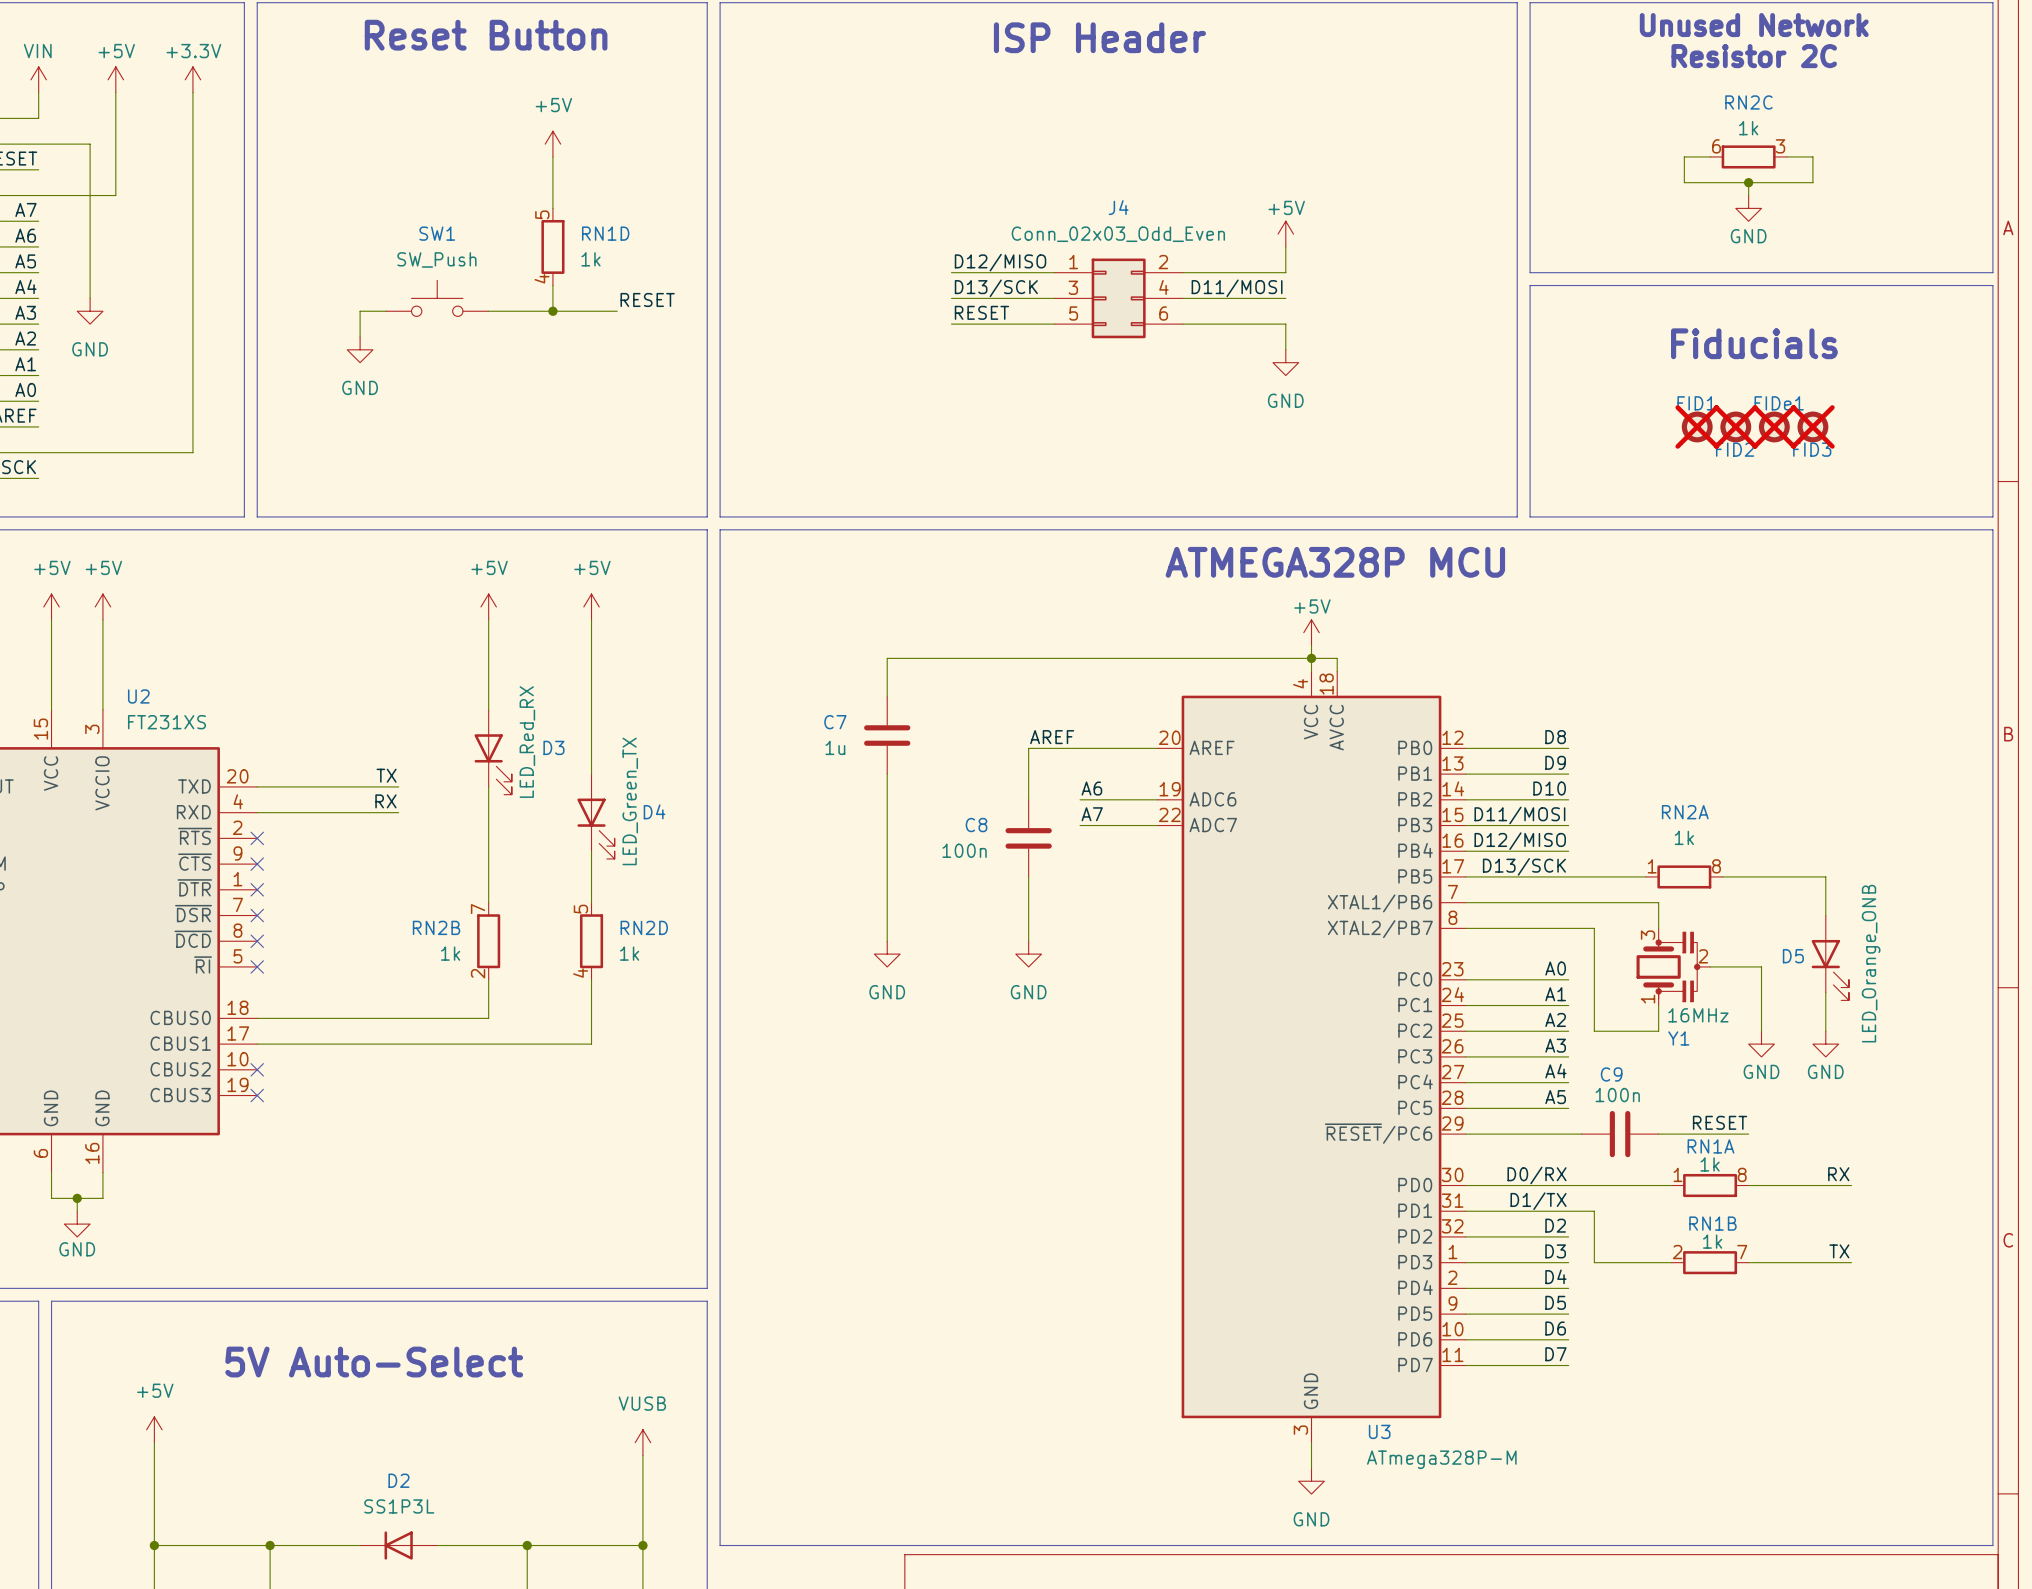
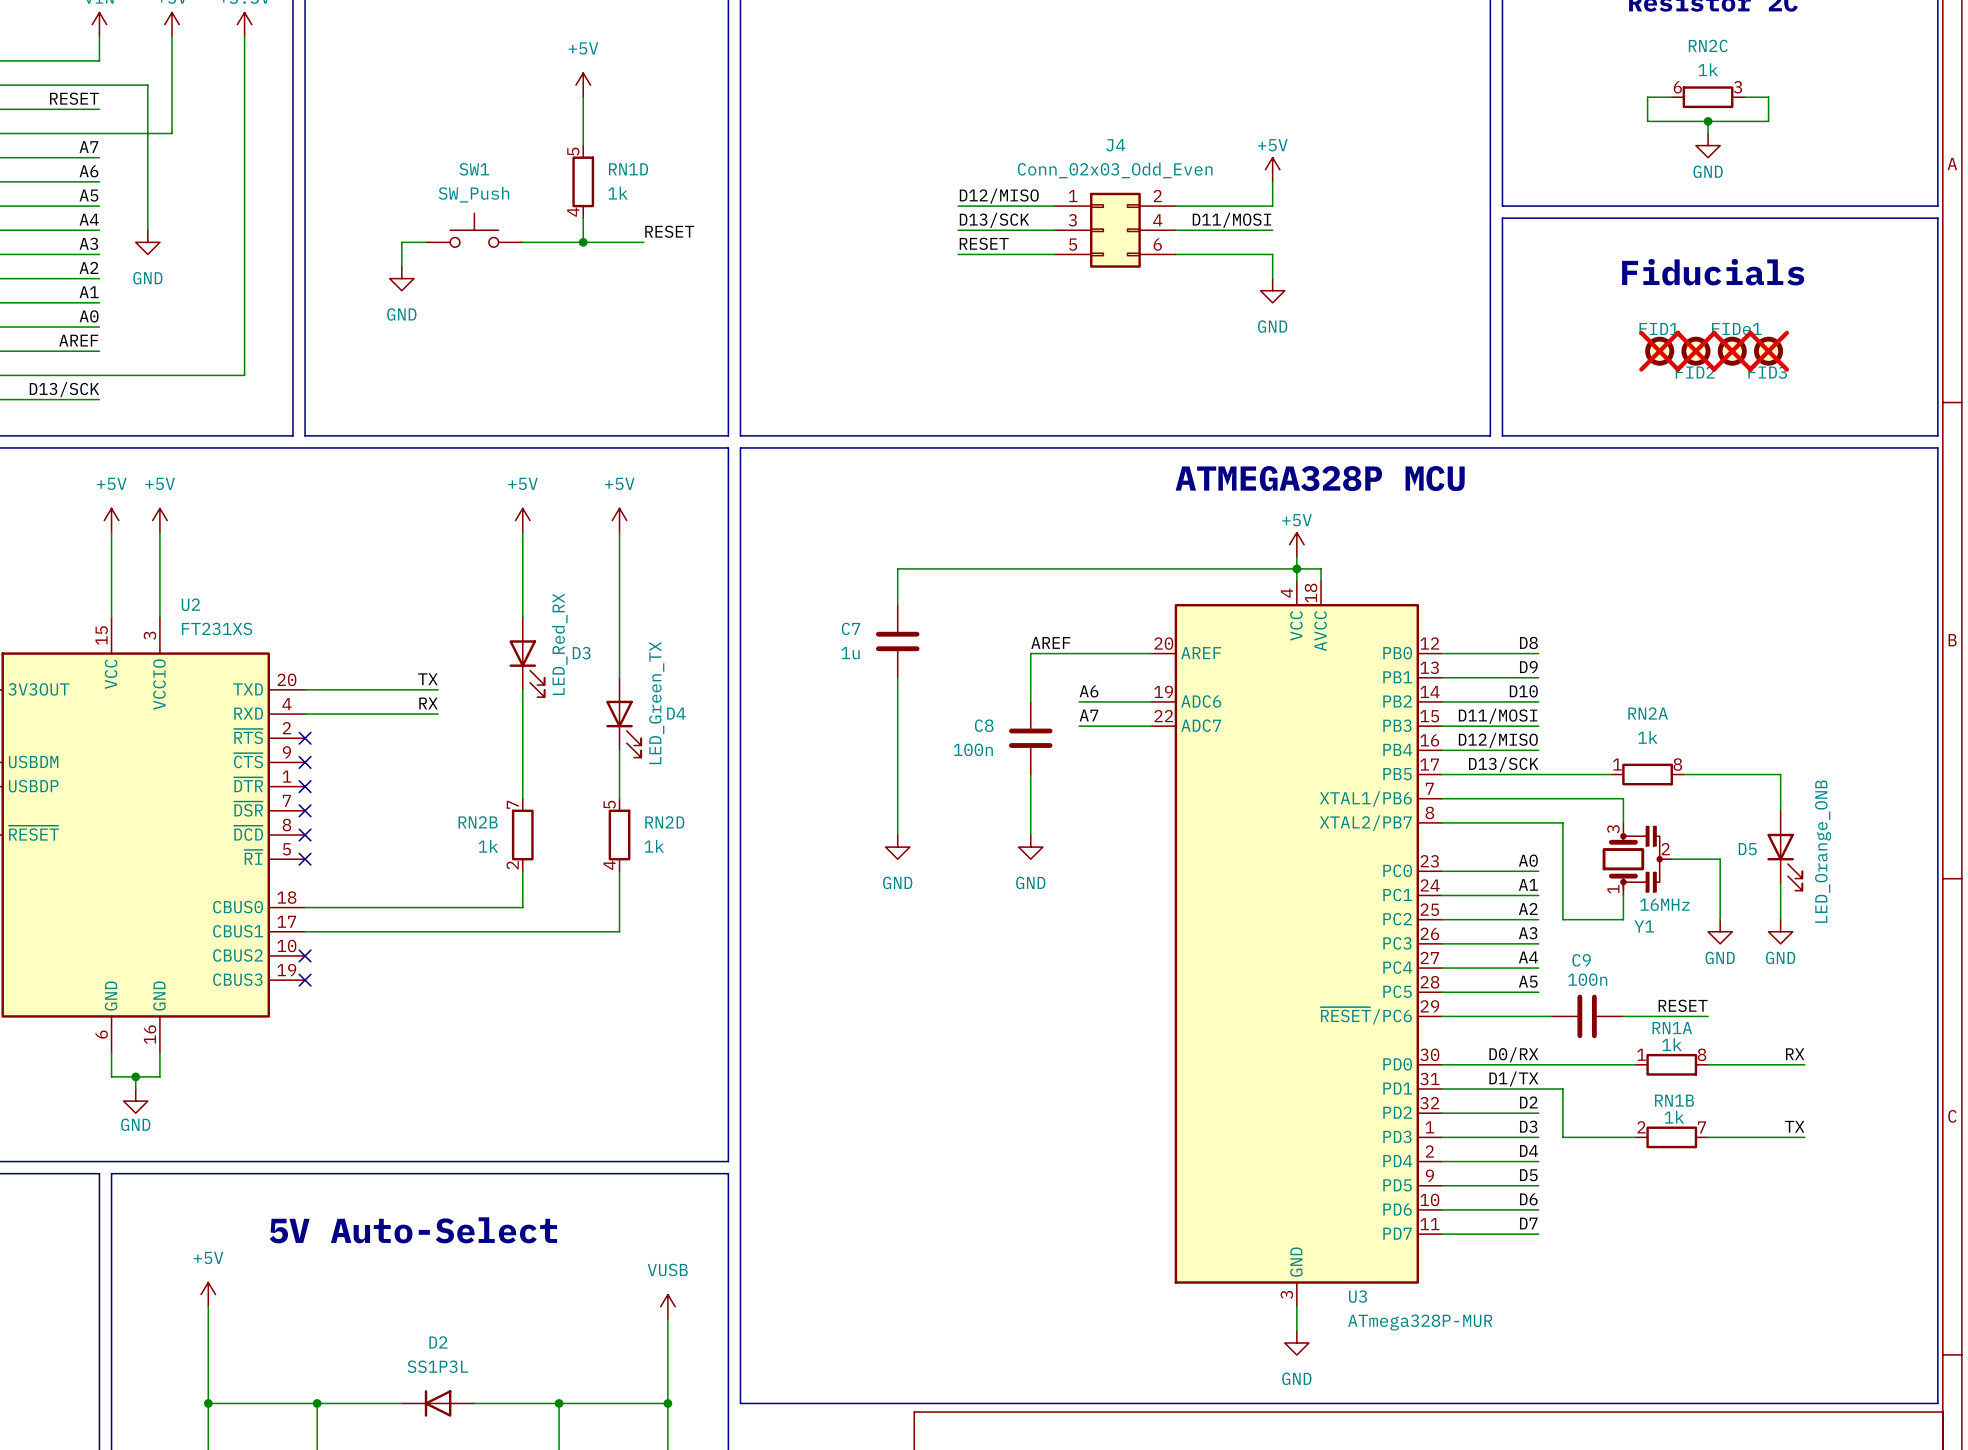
U3 value: ATmega328P-M (1441, 1459) -> ATmega328P-MUR (1420, 1322)

